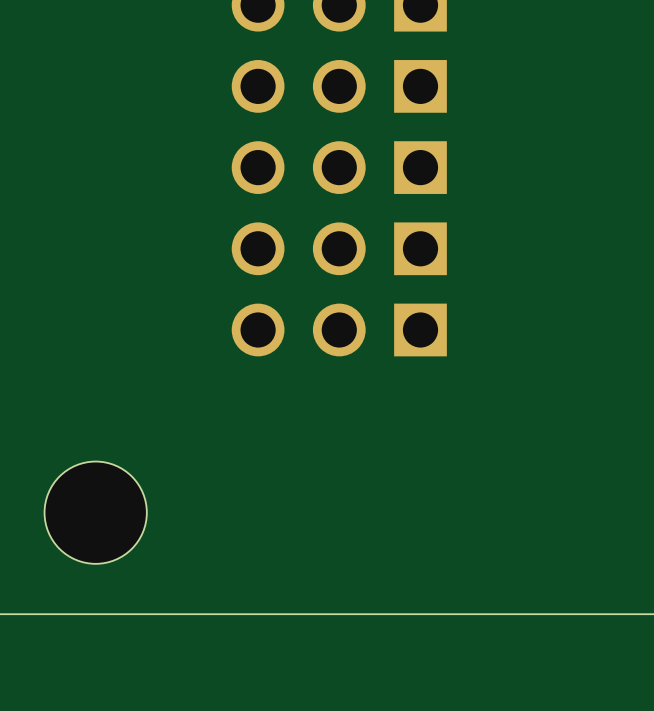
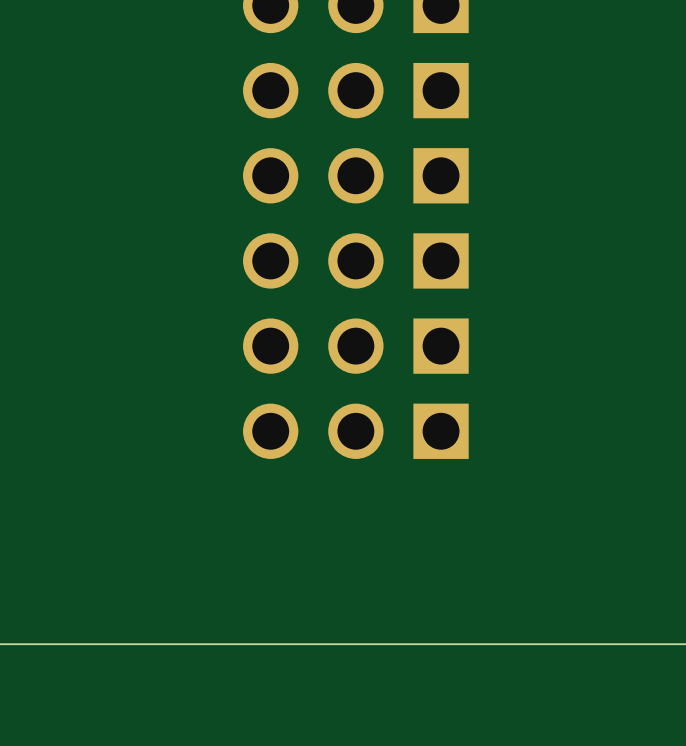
part: none -> (355, 431)
hole: (95, 512) -> none

